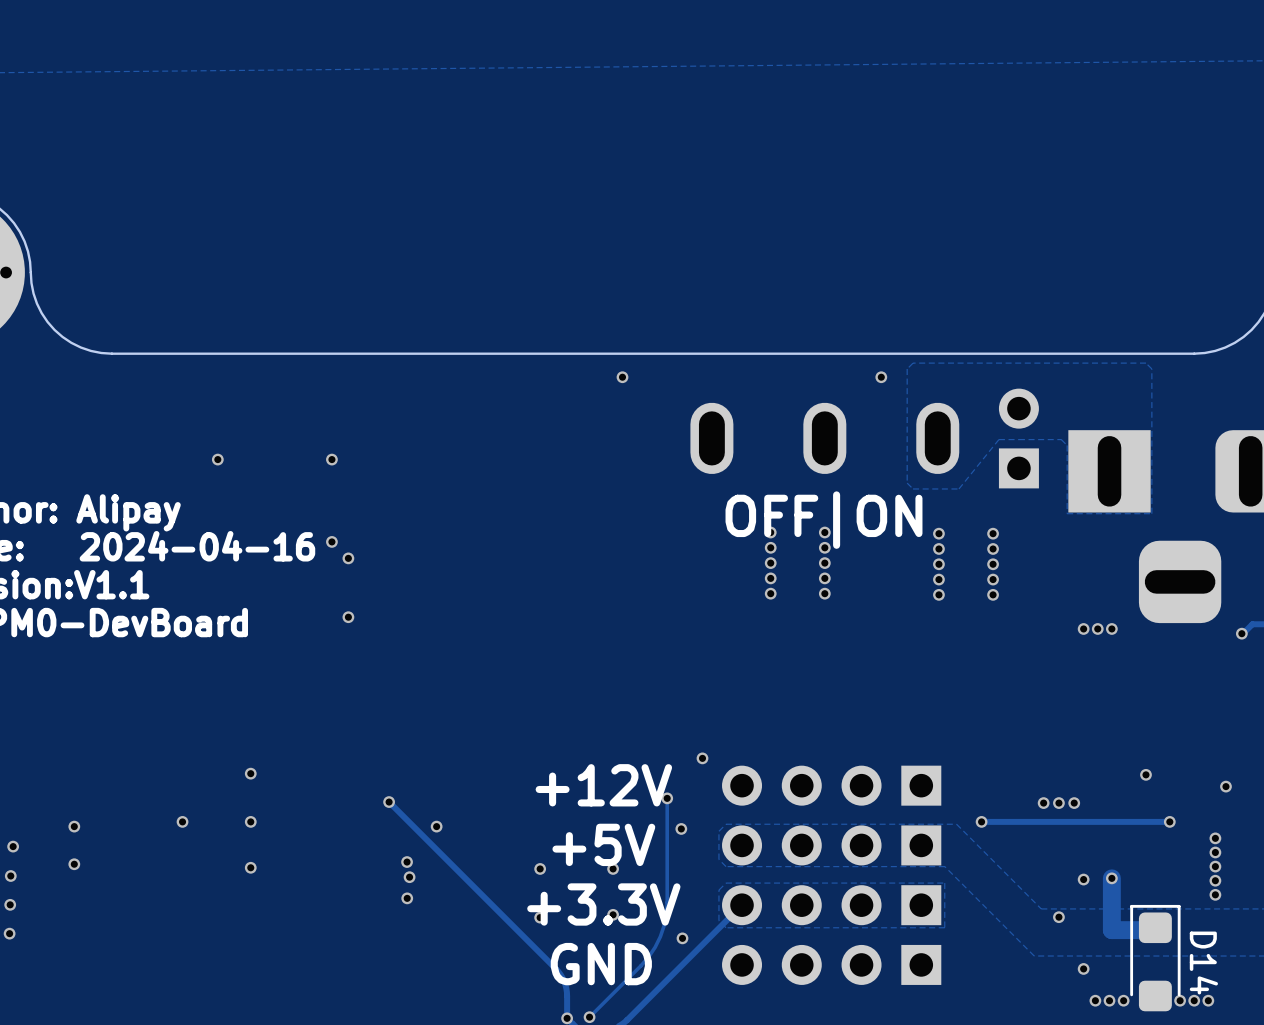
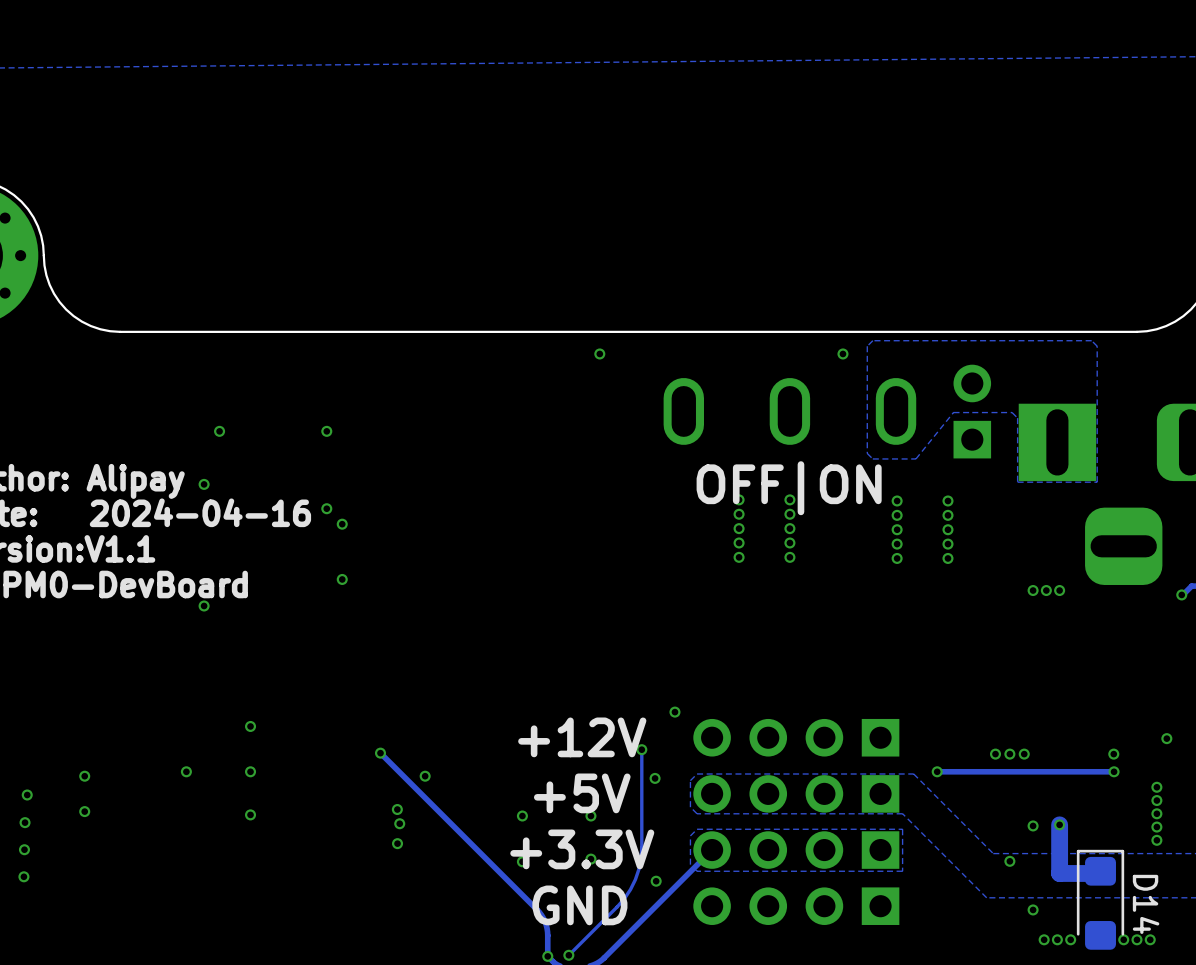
via: none -> (204, 484)
via: none -> (204, 605)
via position: (1145, 774) -> (1113, 754)

